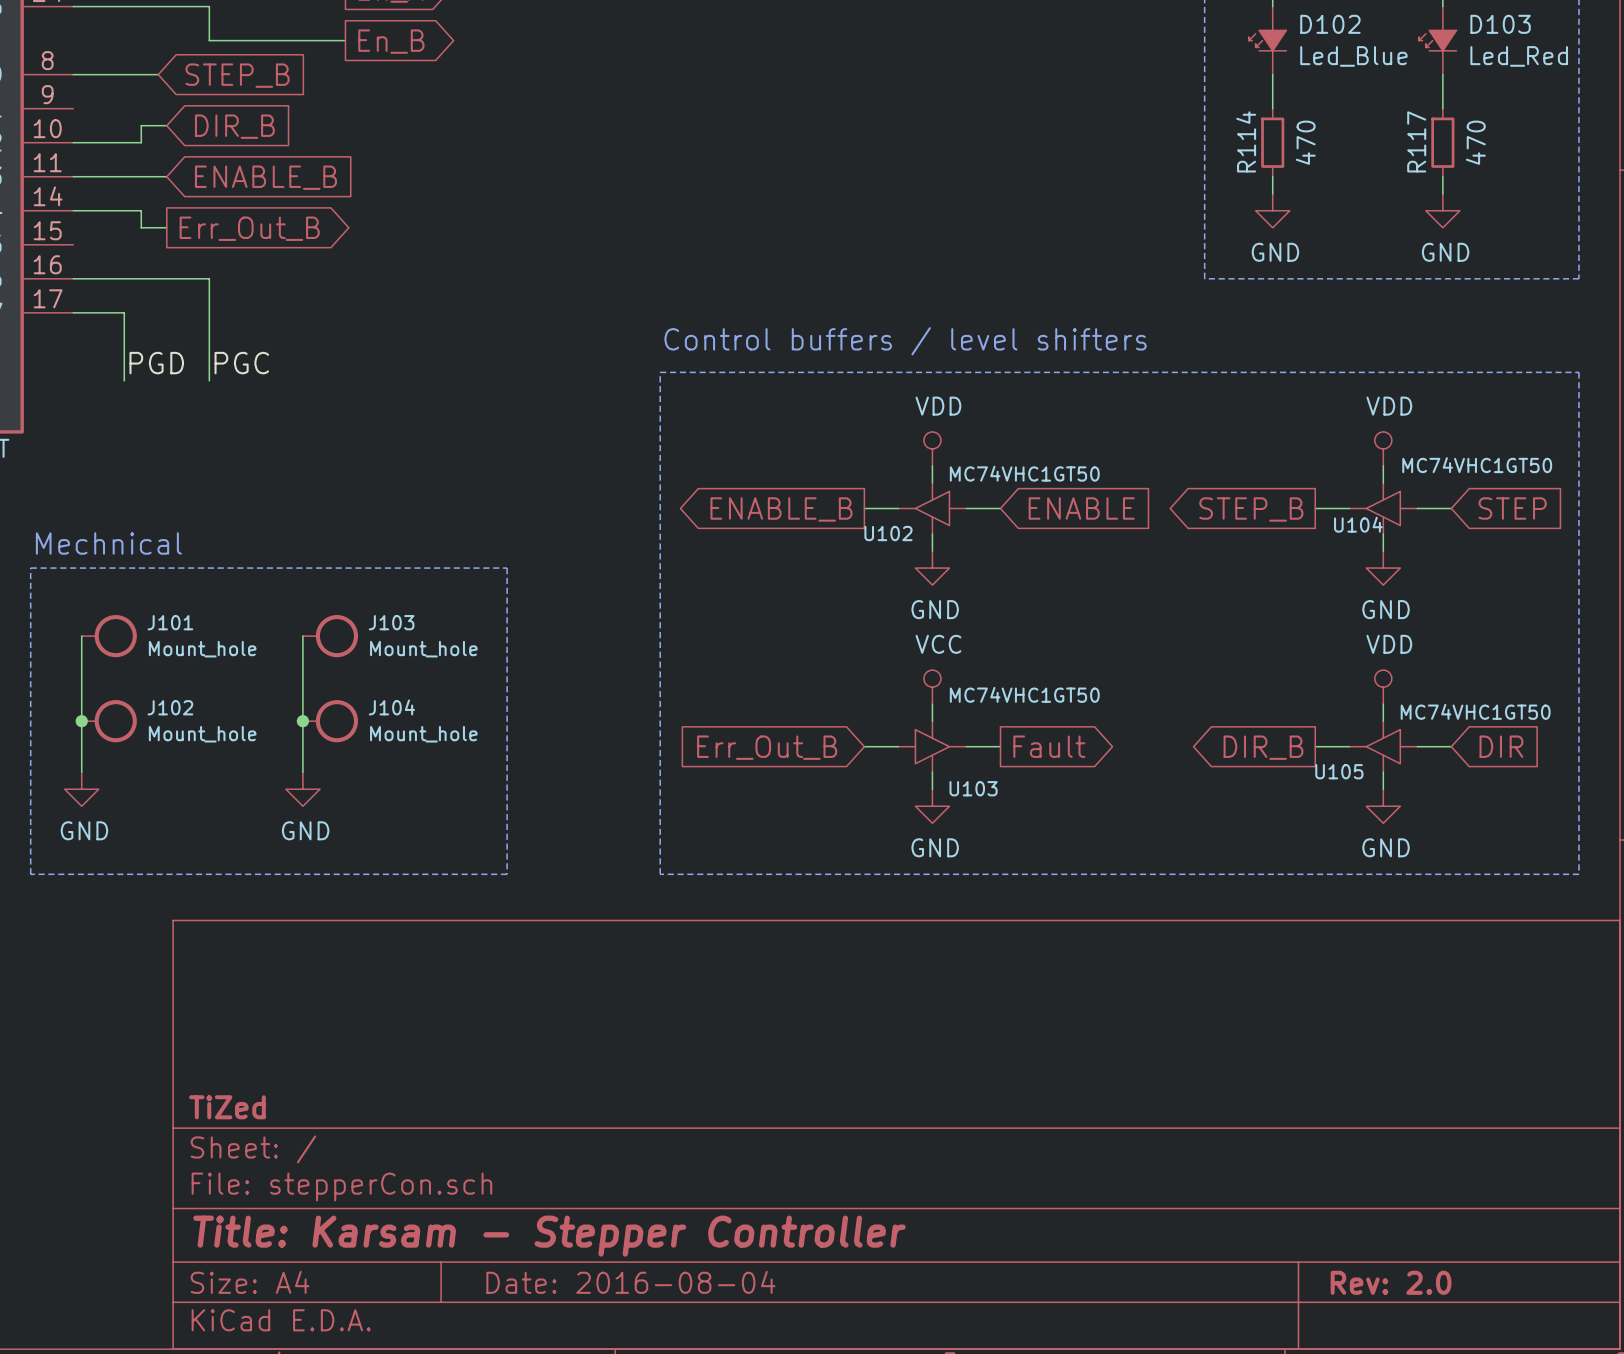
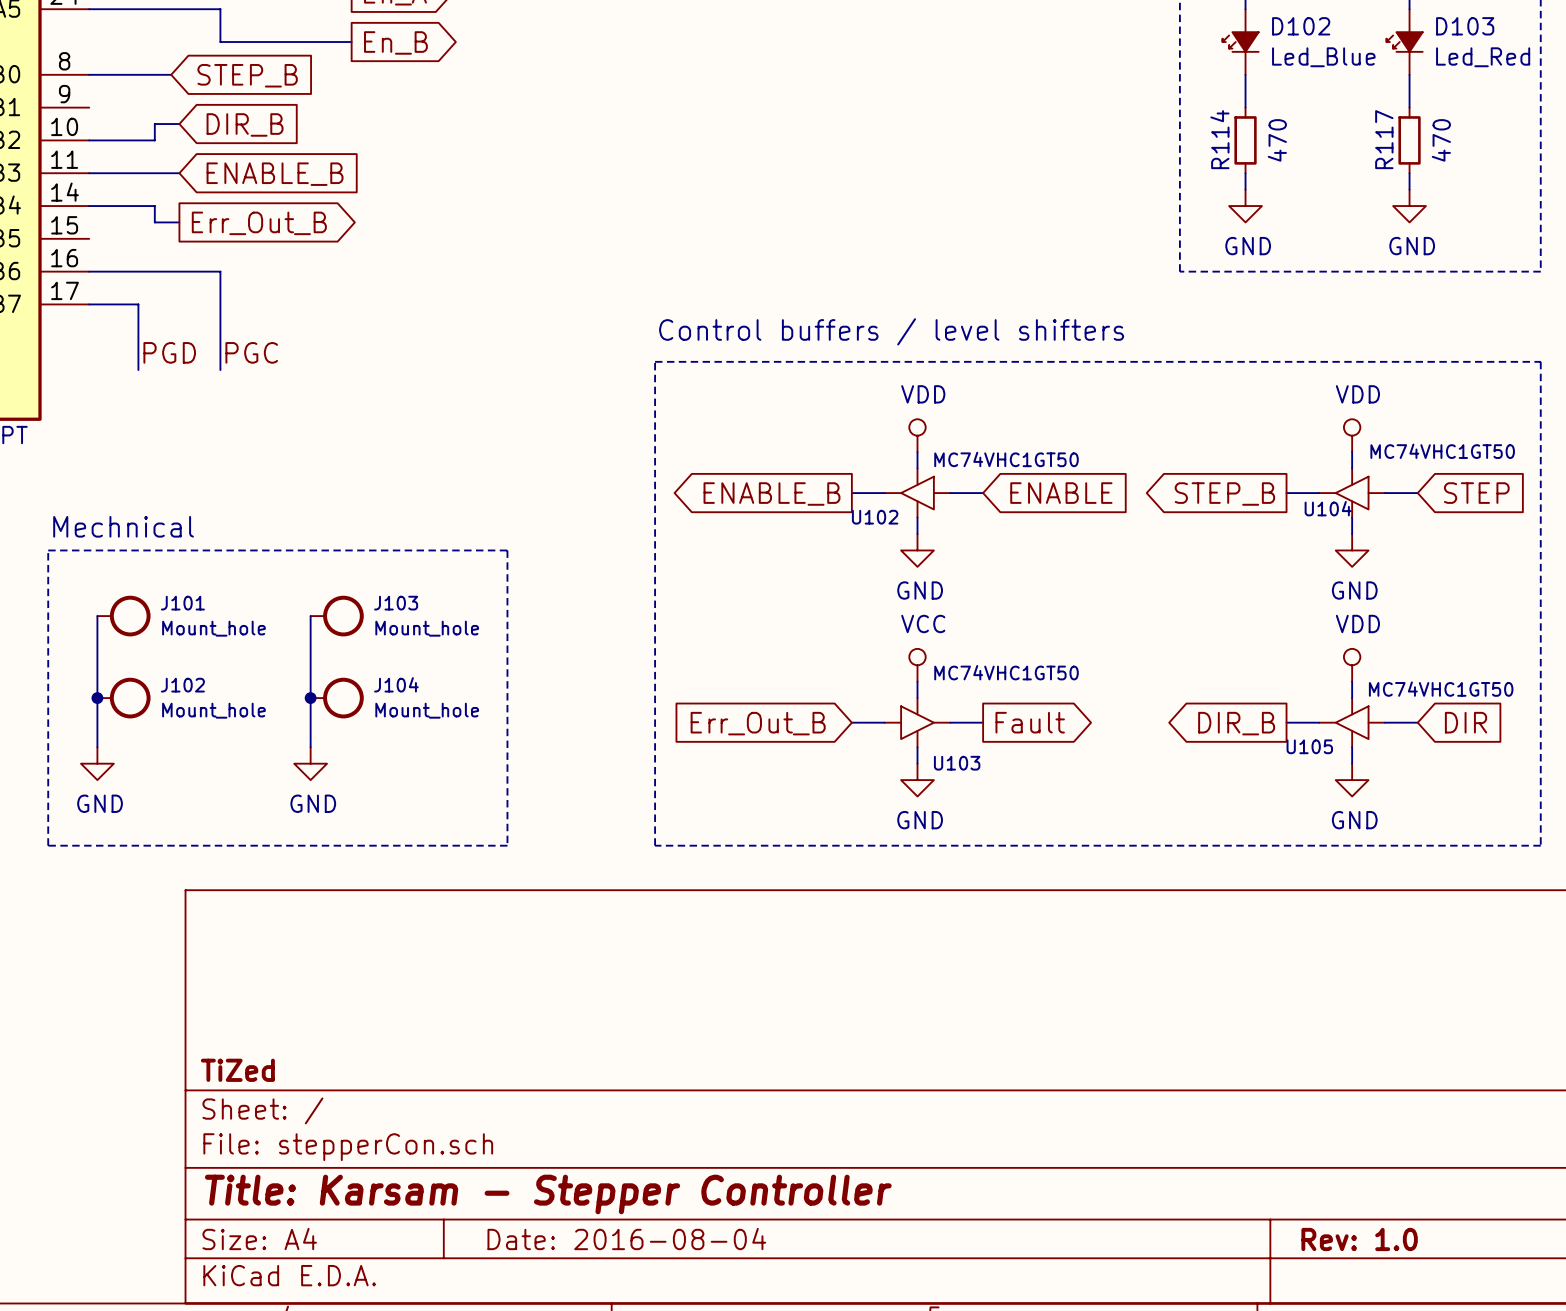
title block: Rev: 2.0 (1391, 1282) -> Rev: 1.0 (1359, 1239)

